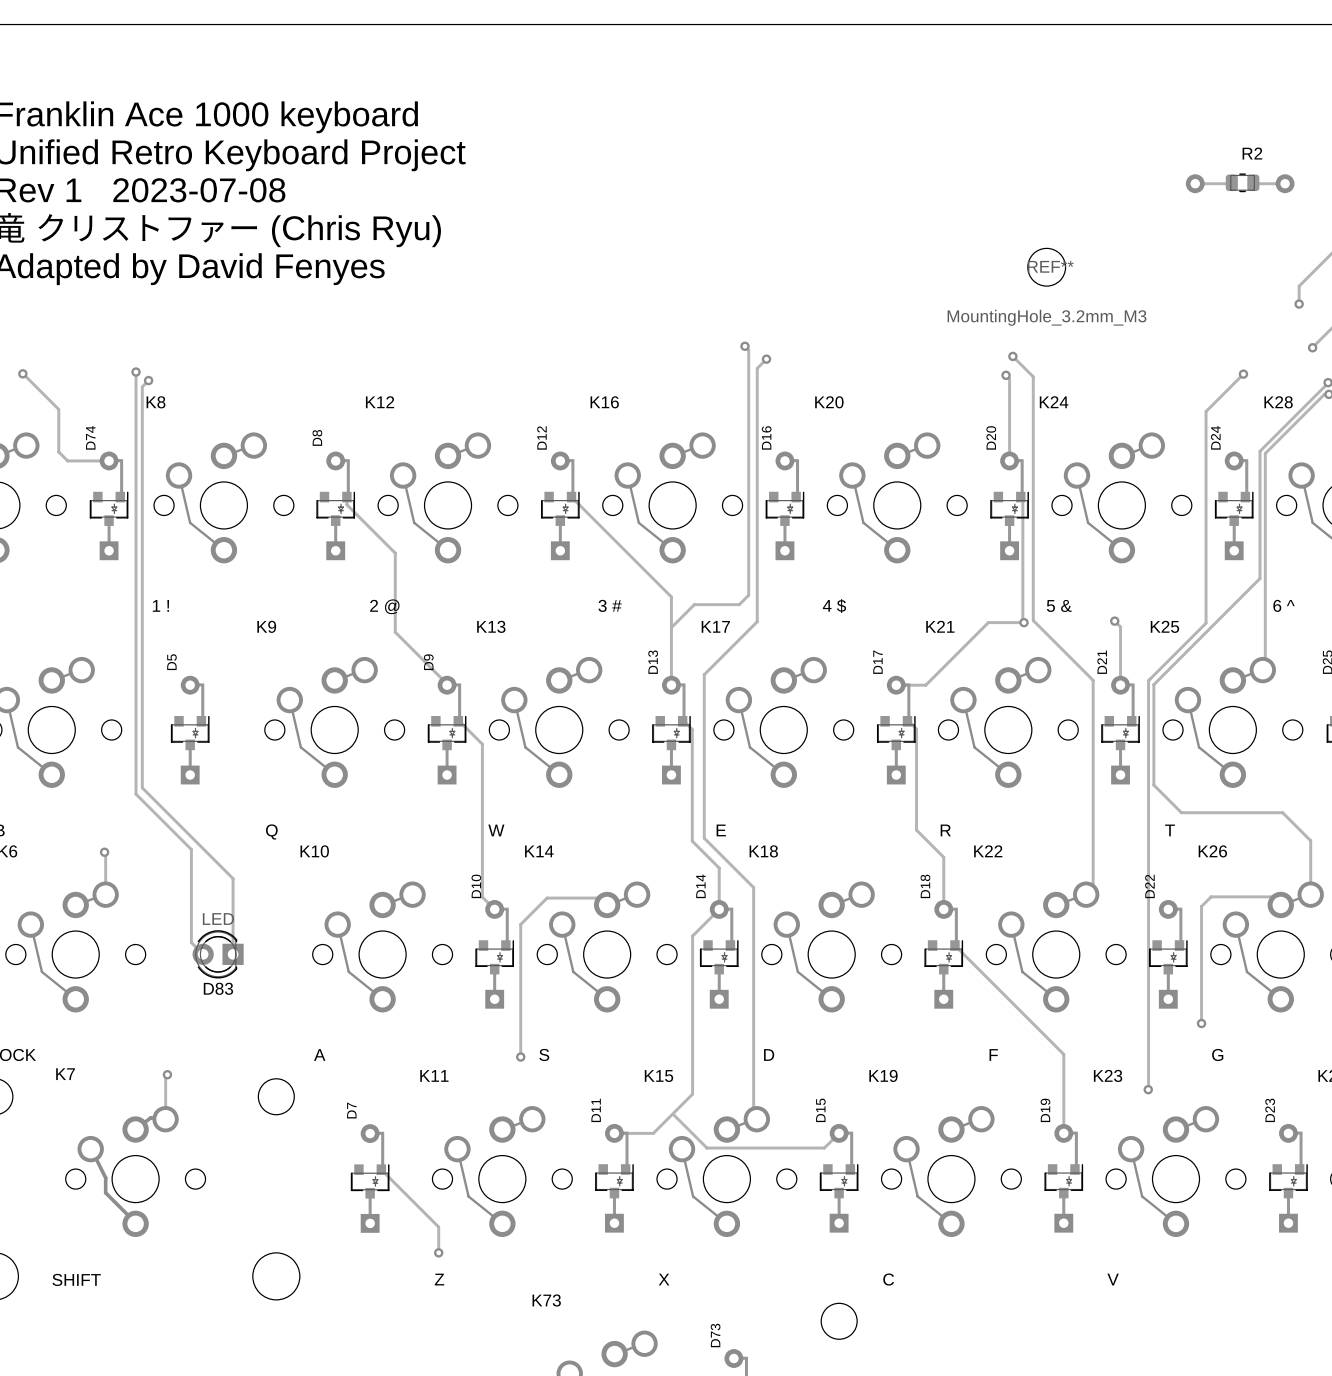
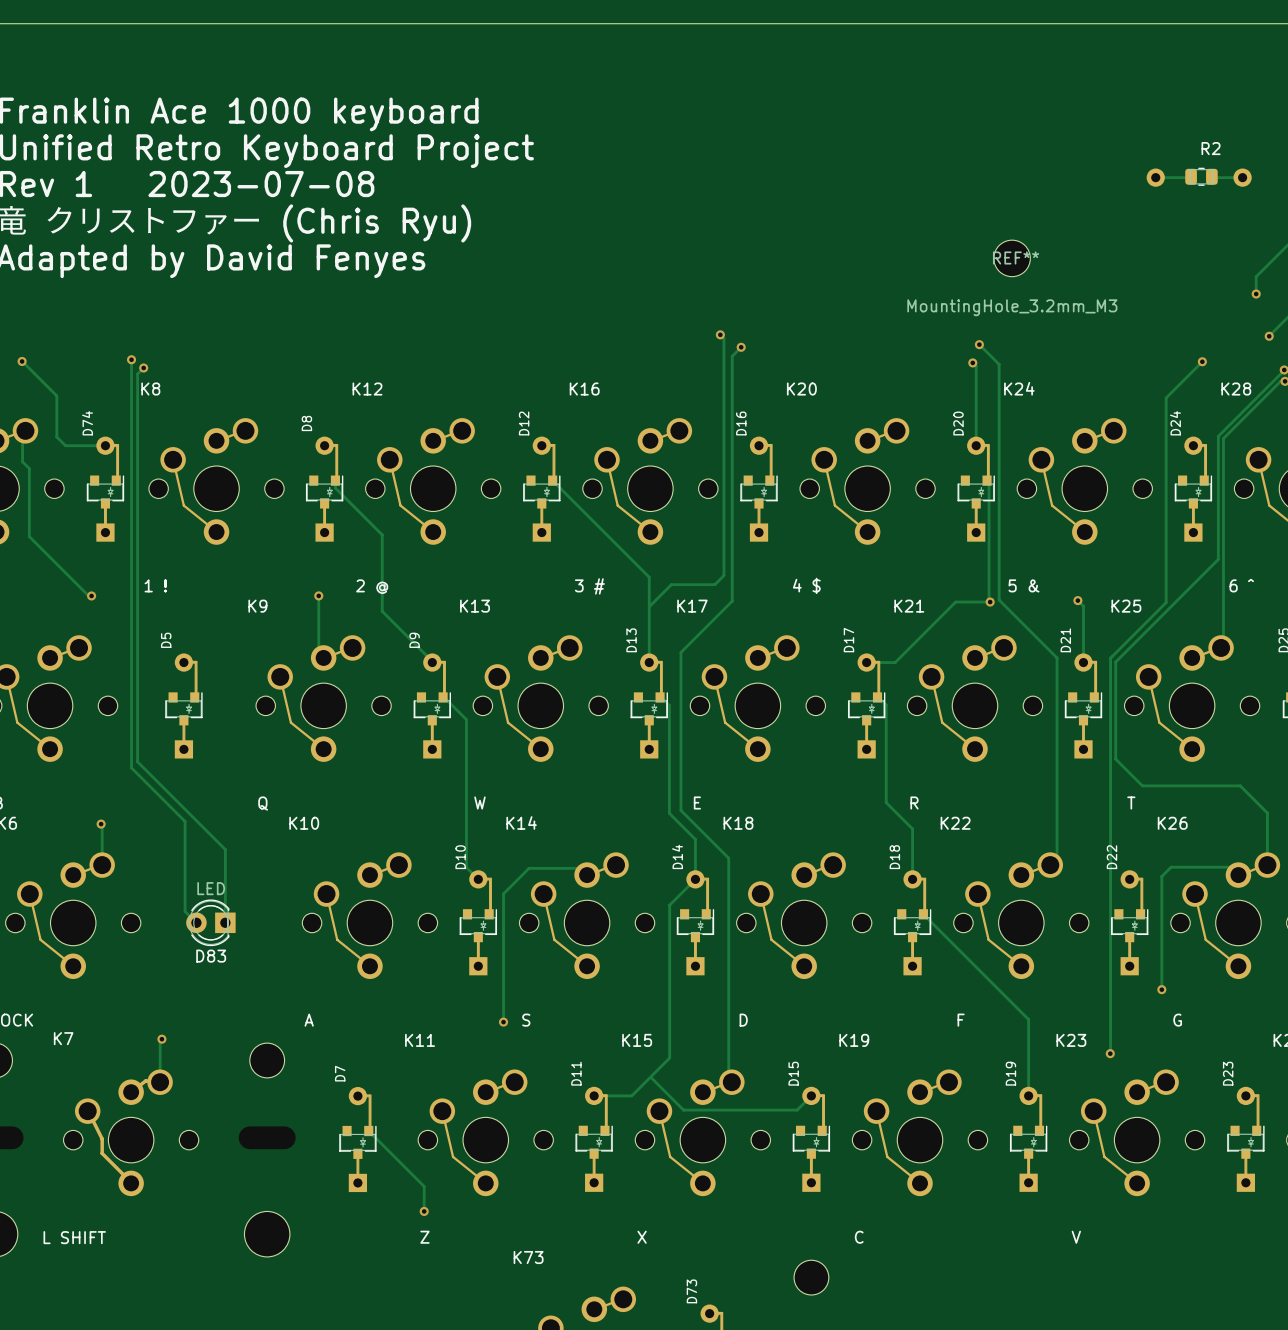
track: none -> (22, 430) (22, 461) (29, 468) (29, 536) (88, 595) (91, 595)
via: none -> (91, 595)
track: none -> (318, 595) (319, 657)
via: none -> (318, 595)
K7 value: SHIFT (76, 1279) -> L SHIFT (74, 1237)

